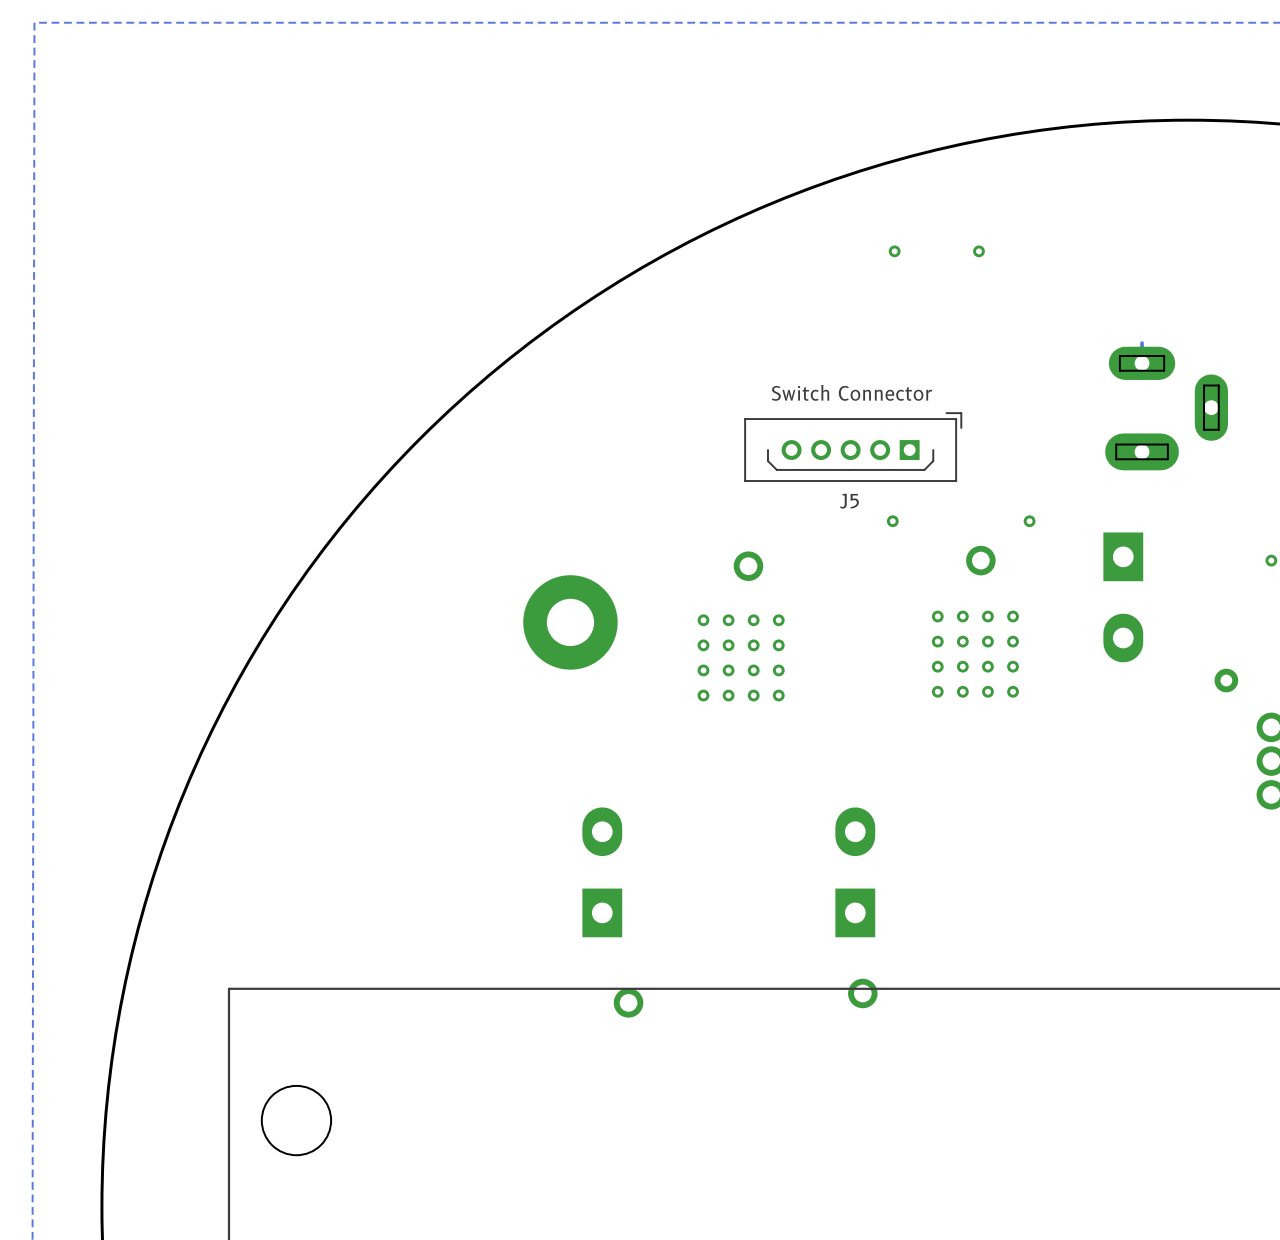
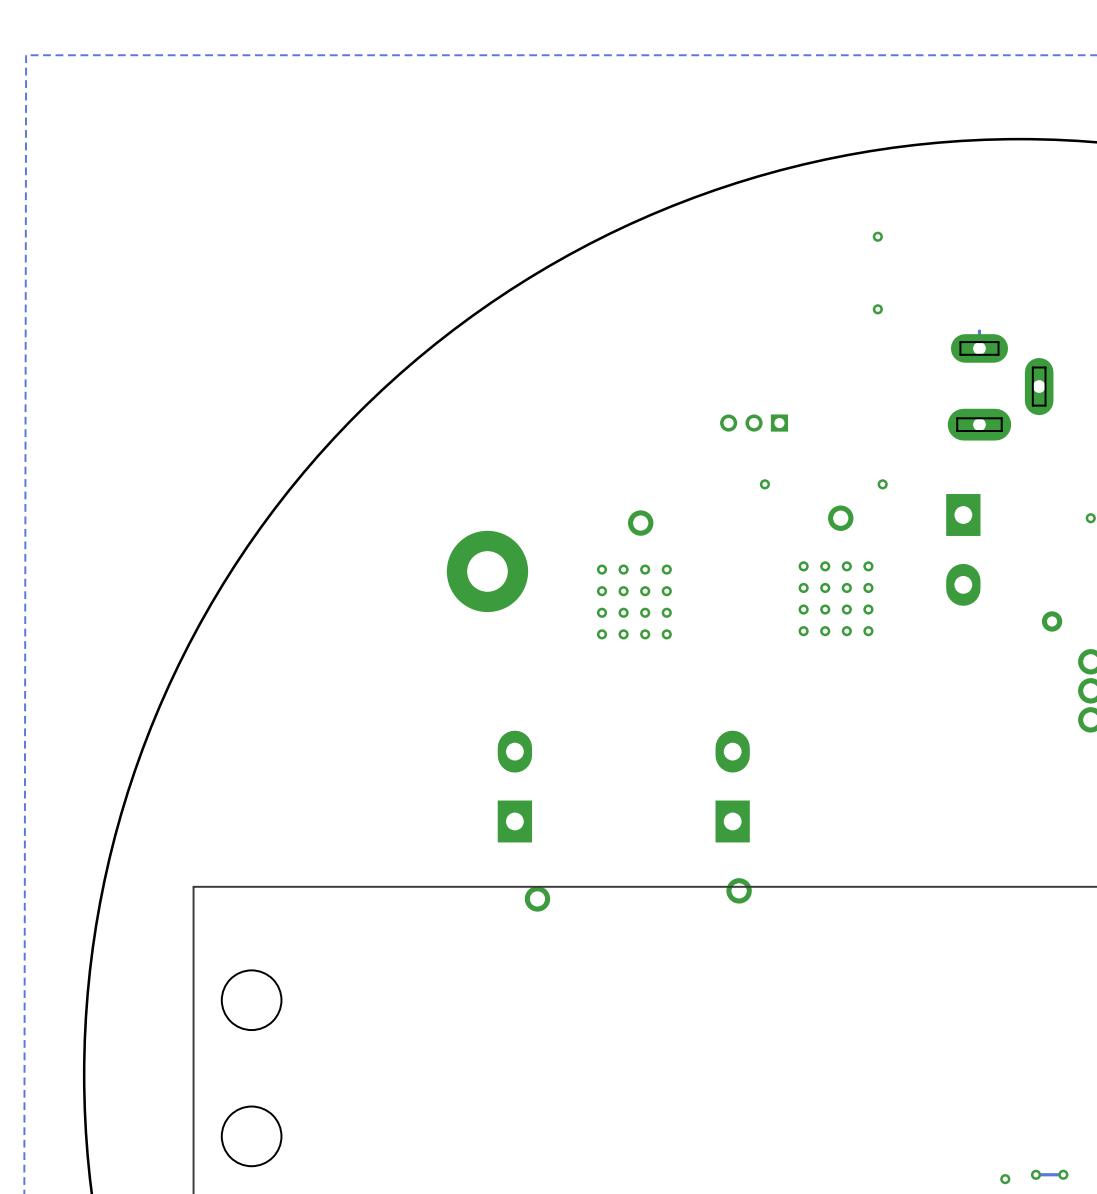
via: none -> (877, 236)
via: (894, 251) -> none
via: (978, 251) -> none
via: none -> (877, 309)
text: Switch Connector (851, 392) -> none
J5: (853, 447) -> none

